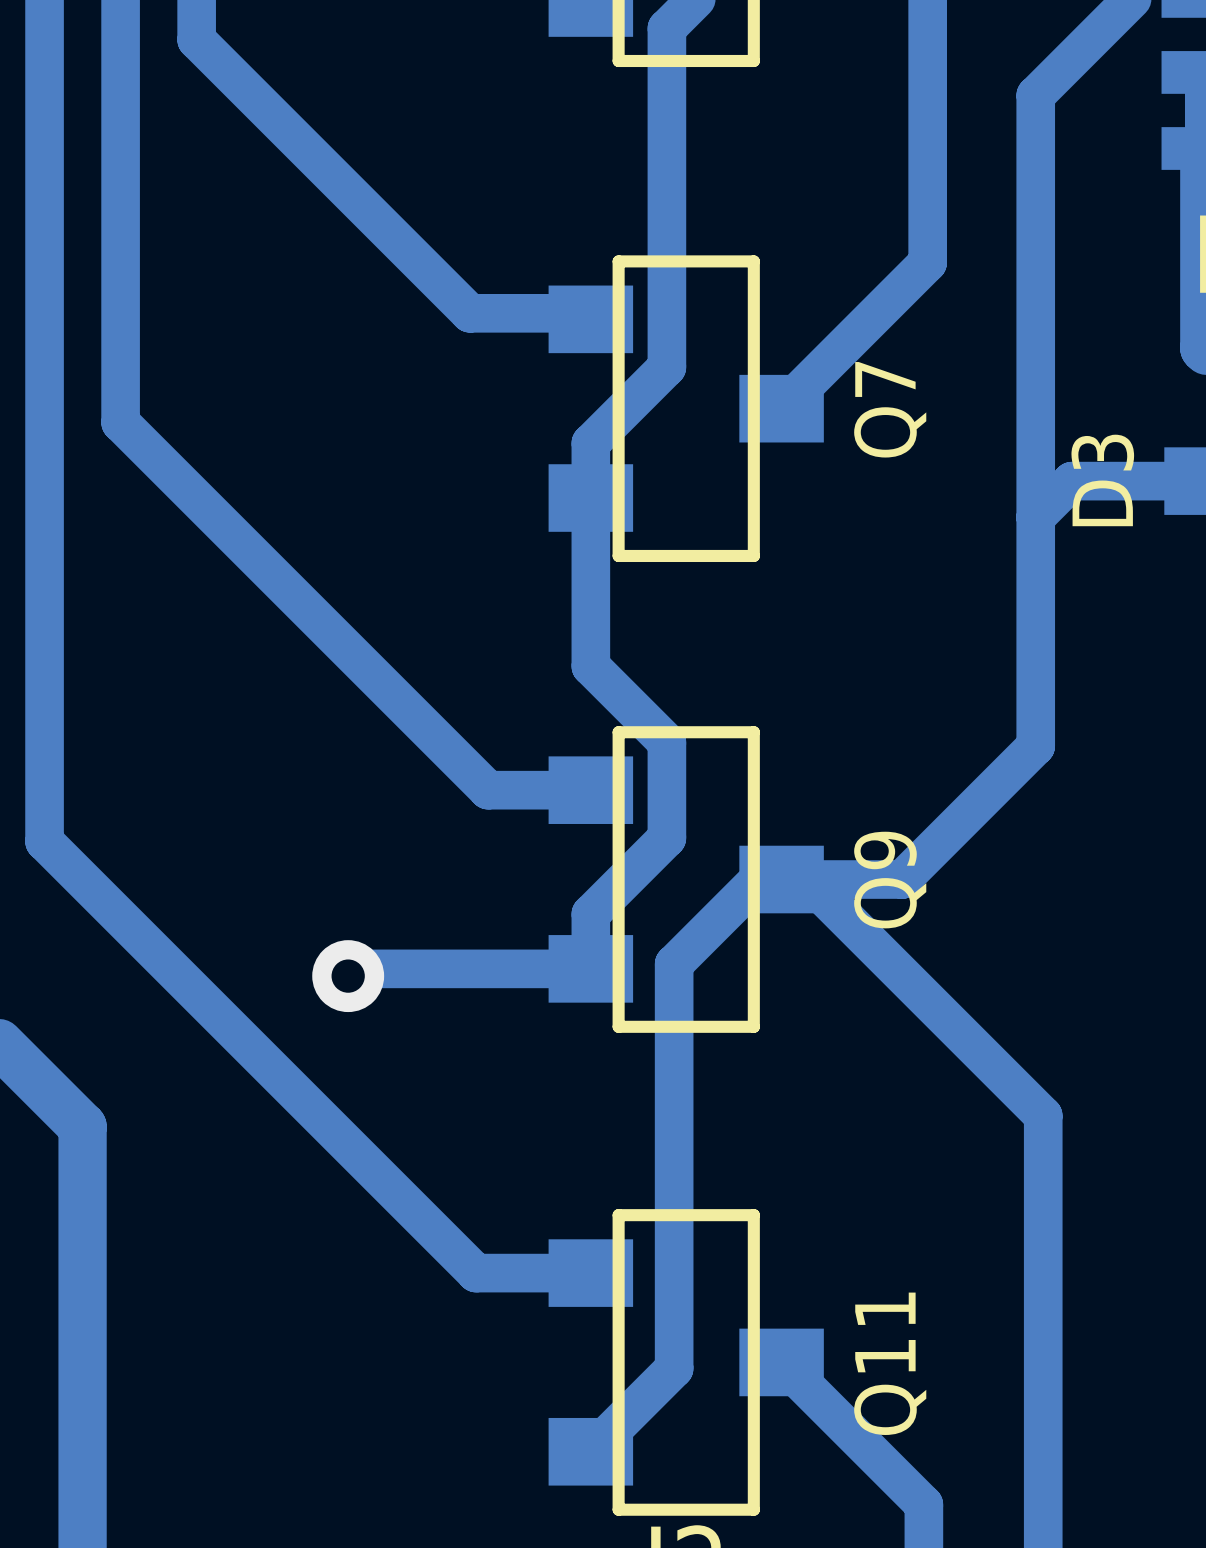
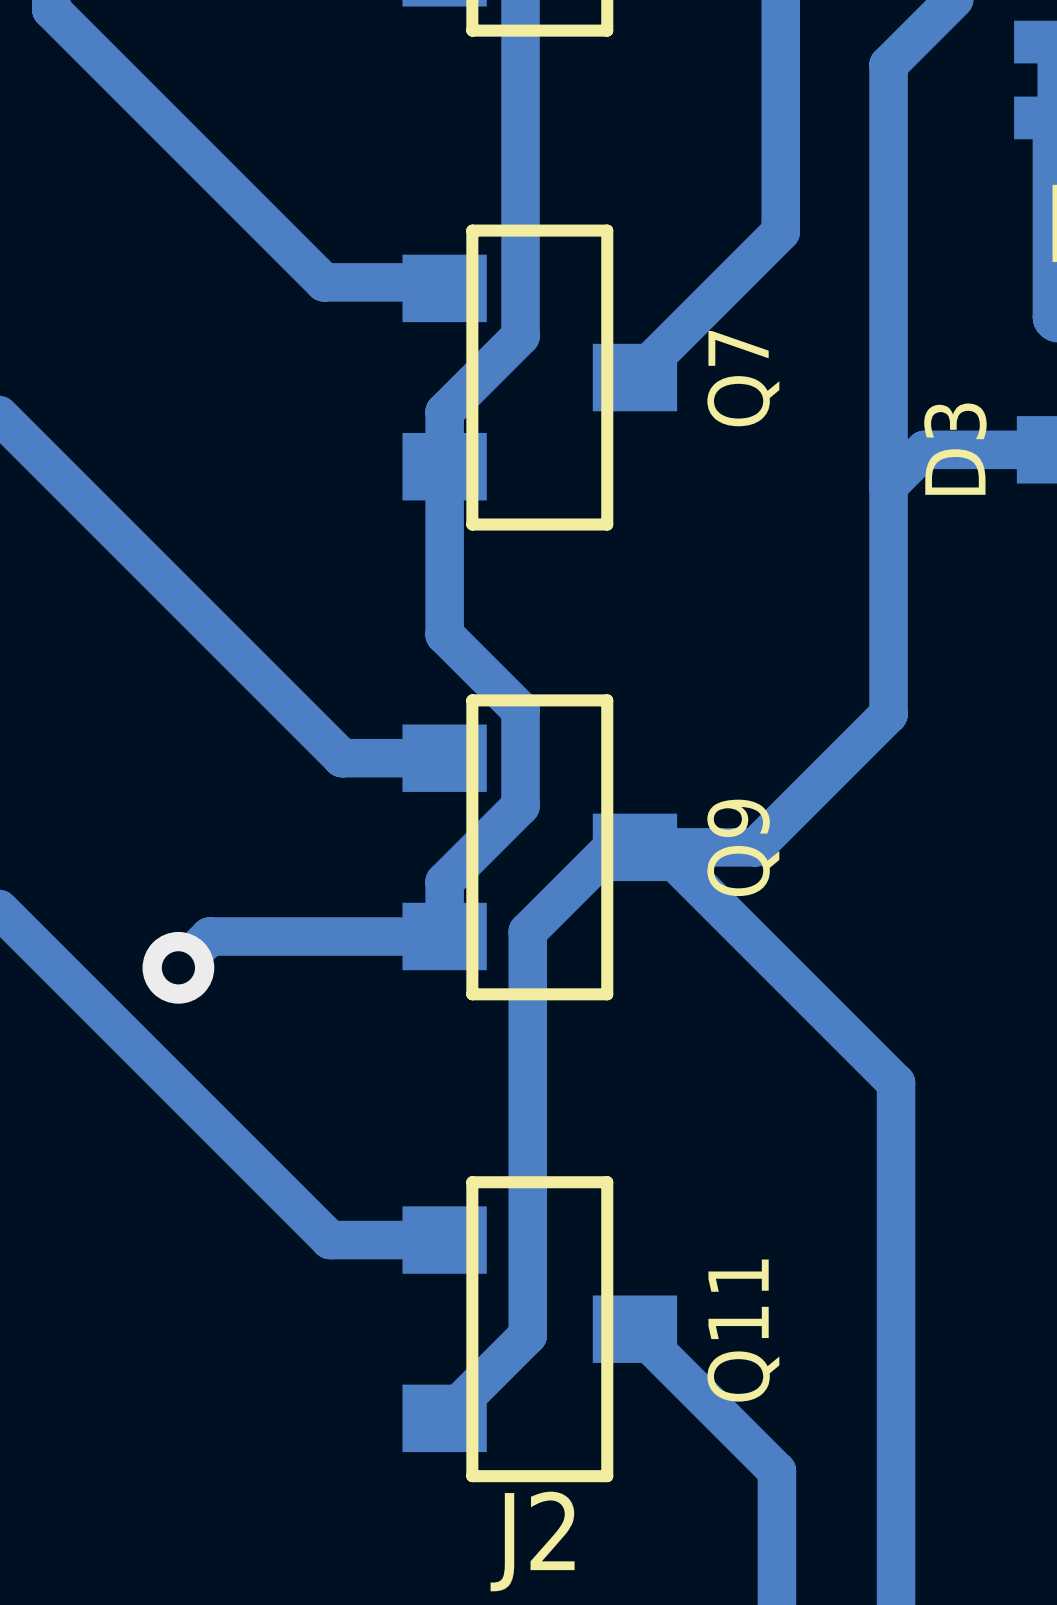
via position: (348, 976) -> (178, 967)

